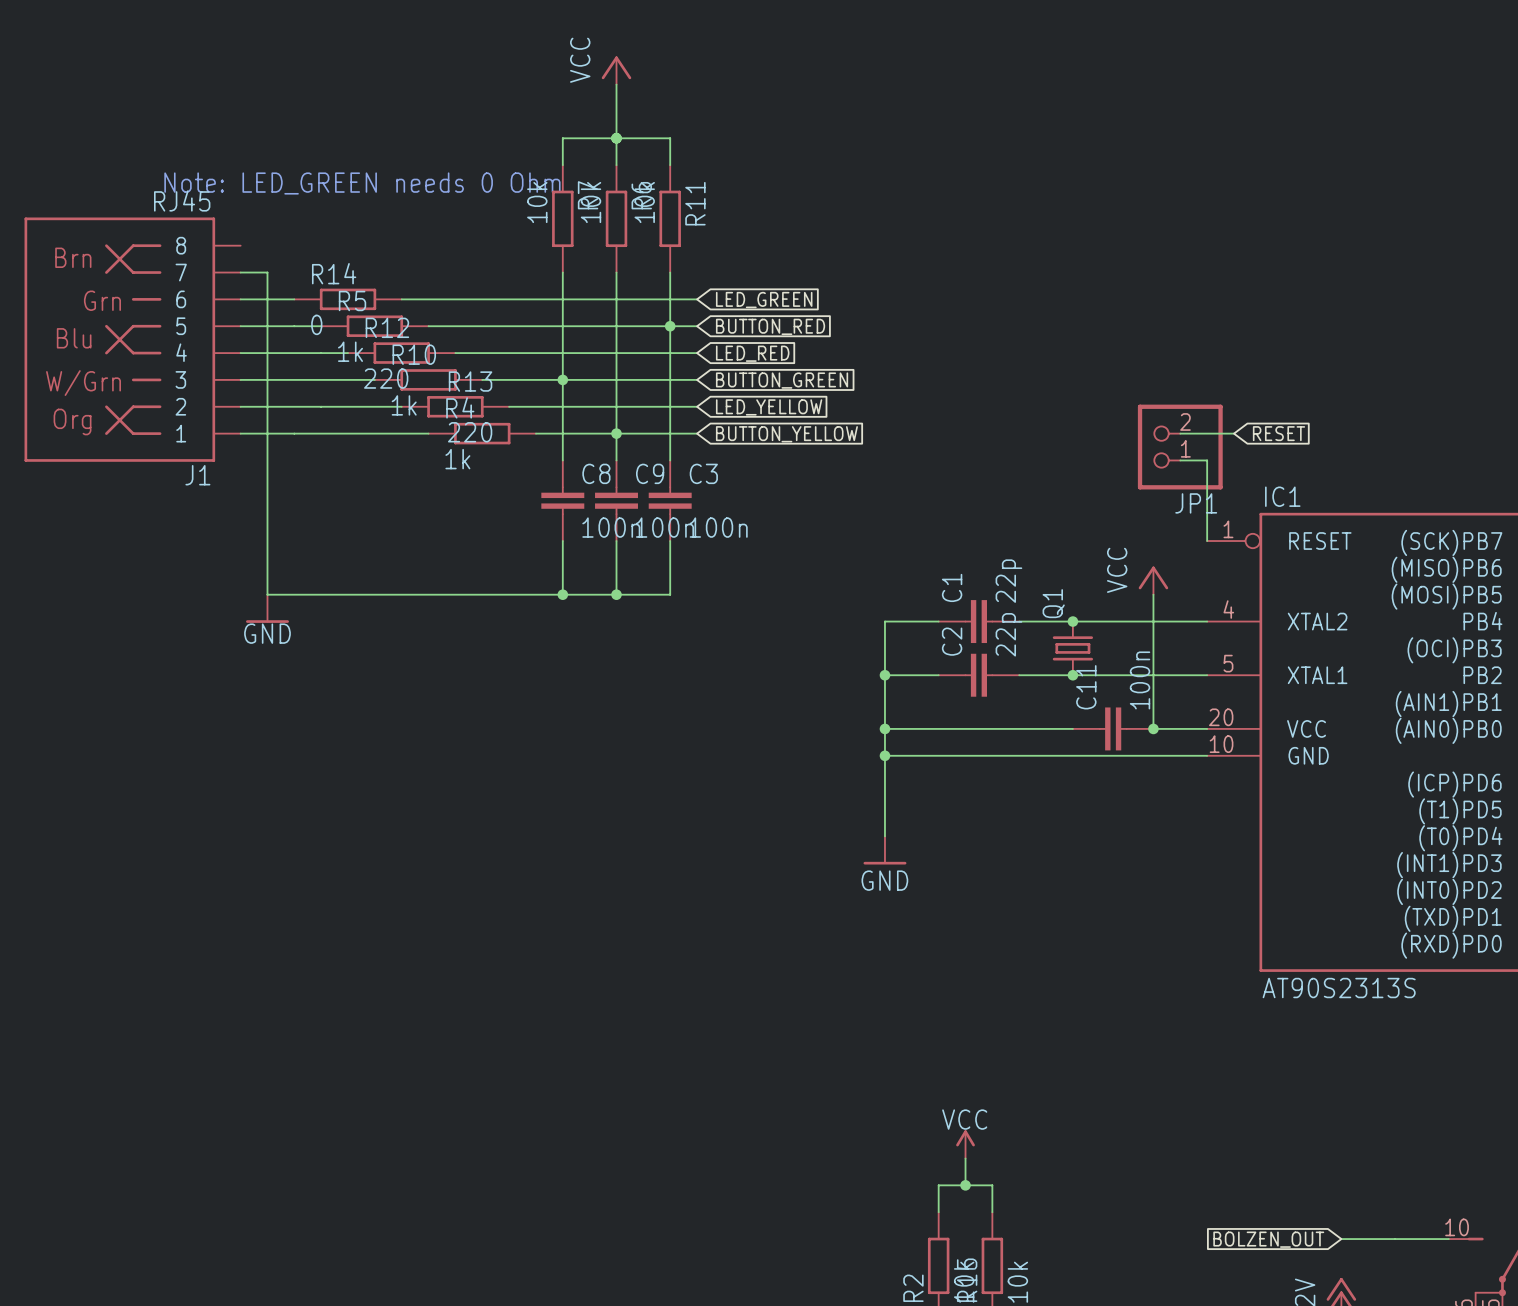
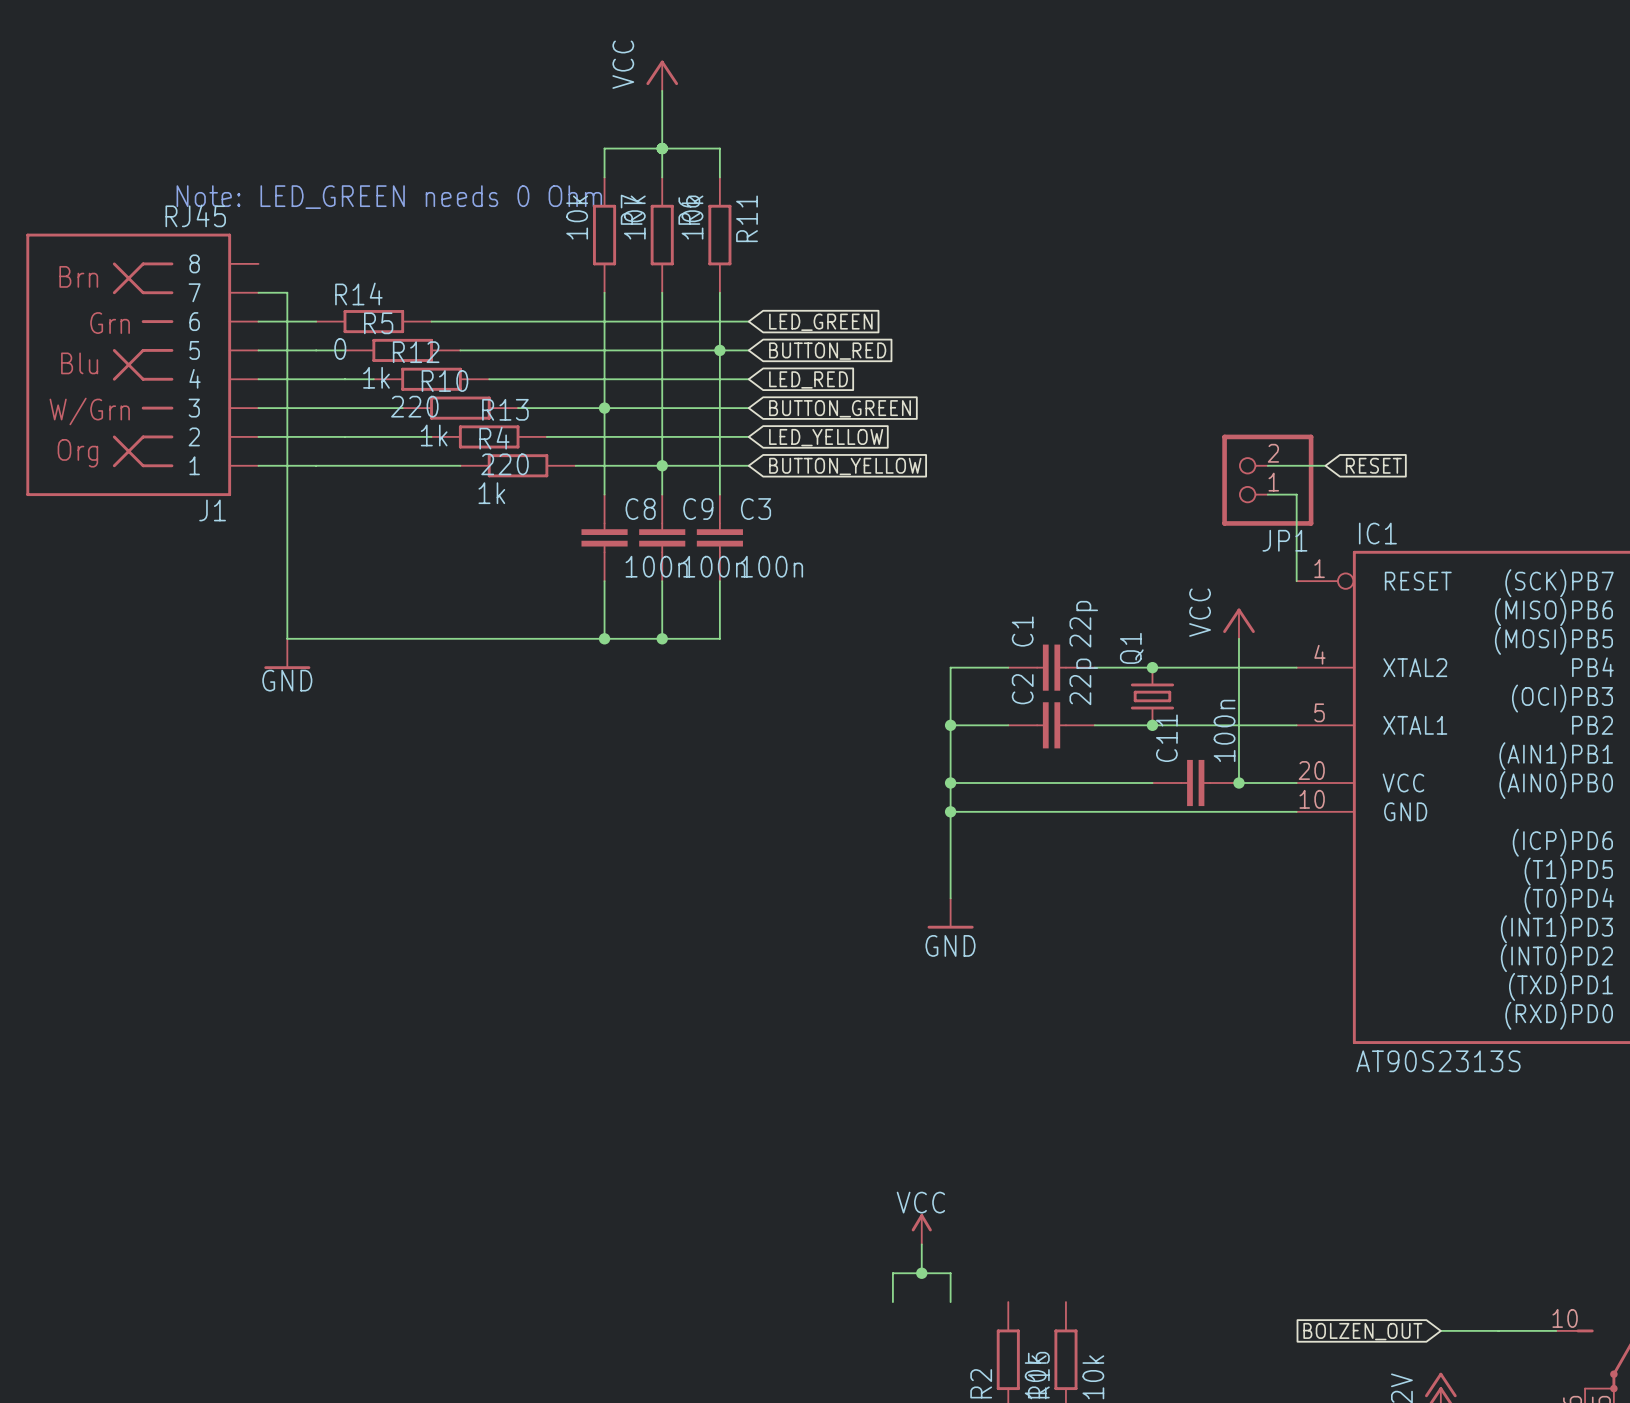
power symbol position: VCC (965, 1144) -> VCC (921, 1229)
wire: (965, 1158) (965, 1185) -> (921, 1244) (921, 1273)
junction: none -> (921, 1273)
junction: (965, 1185) -> none
wire: (938, 1212) (938, 1185) (992, 1185) (992, 1212) -> (892, 1302) (892, 1273) (950, 1273) (950, 1302)

